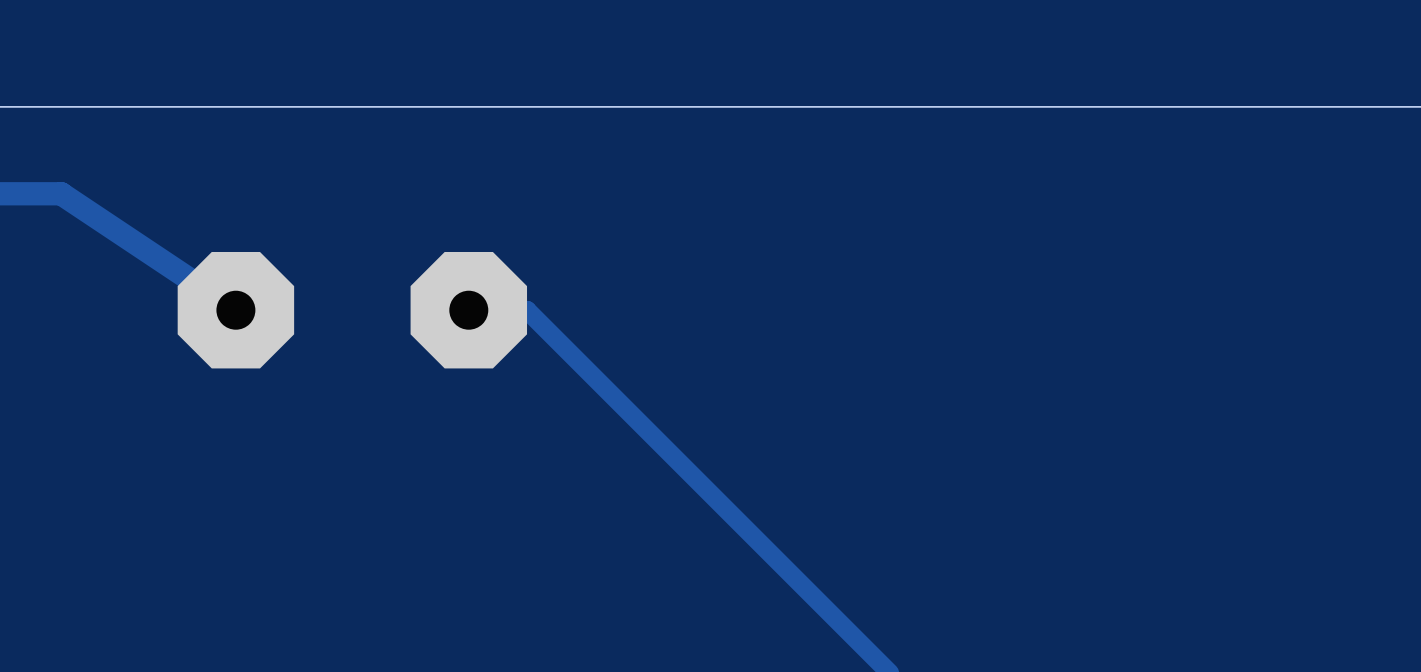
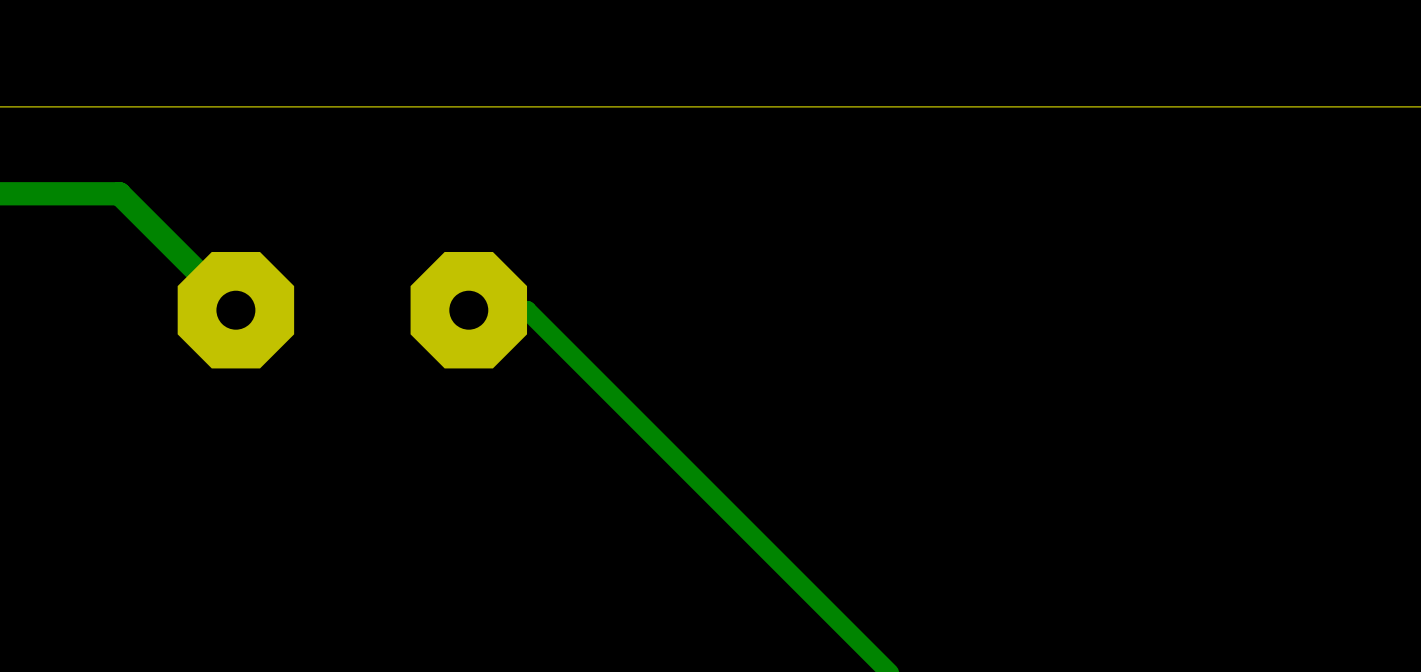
track: (61, 193) (235, 310) -> (61, 193) (119, 193) (235, 310)

